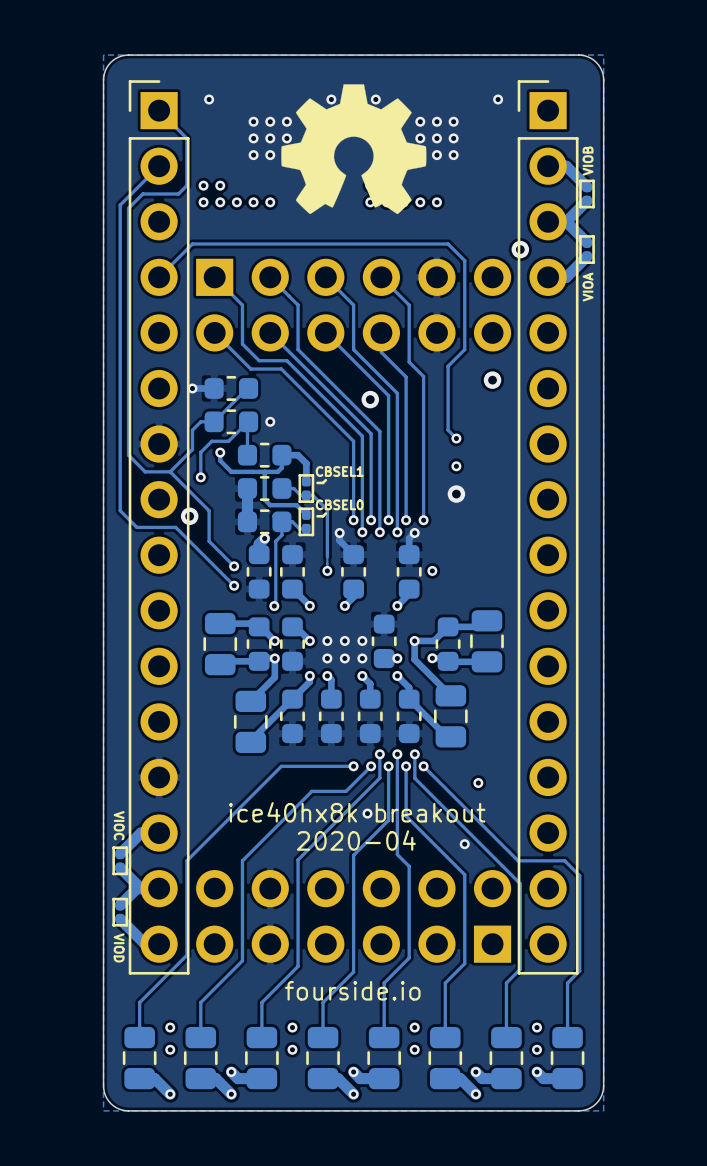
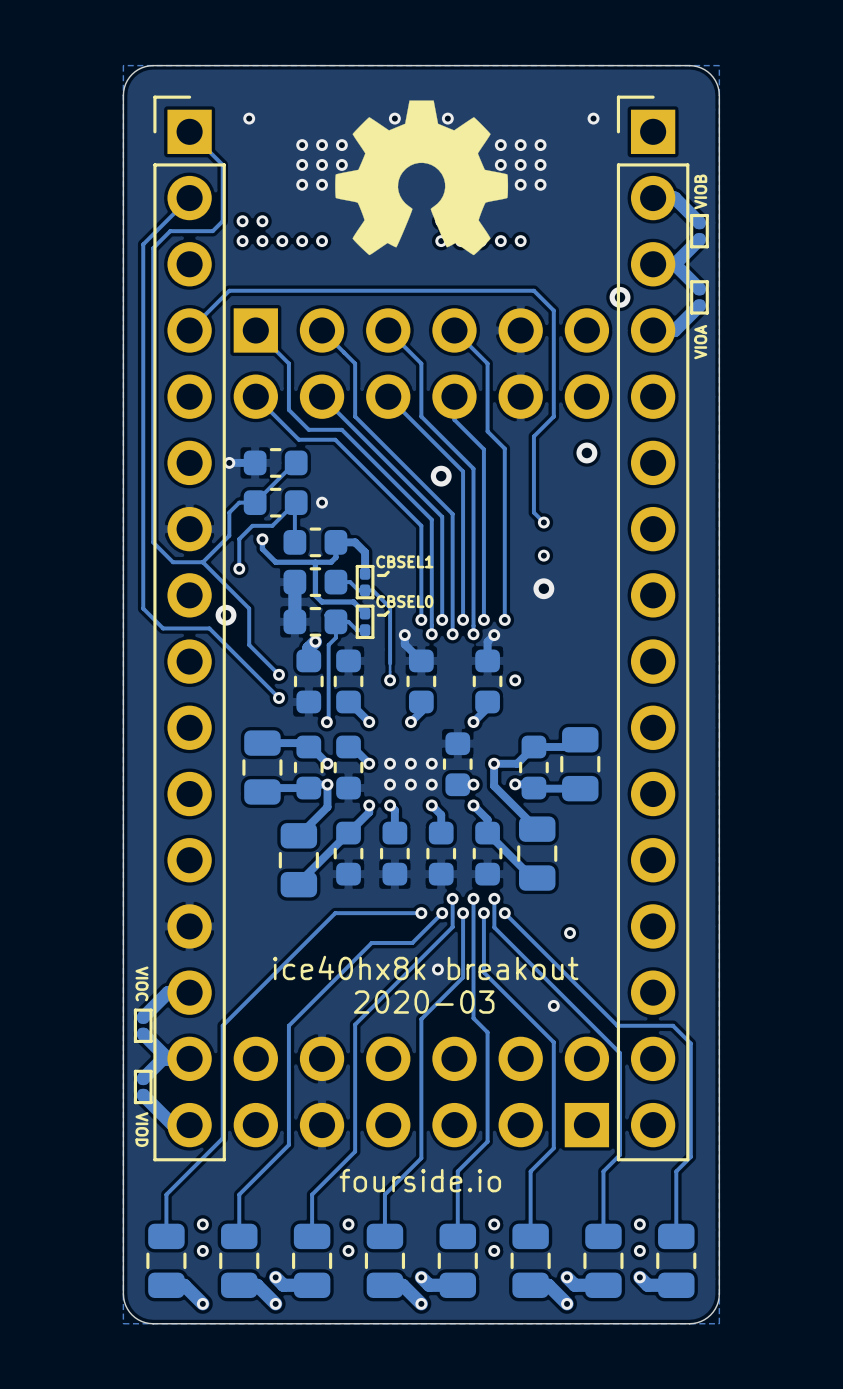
text: 2020-04 (356, 840) -> 2020-03 (424, 1002)

